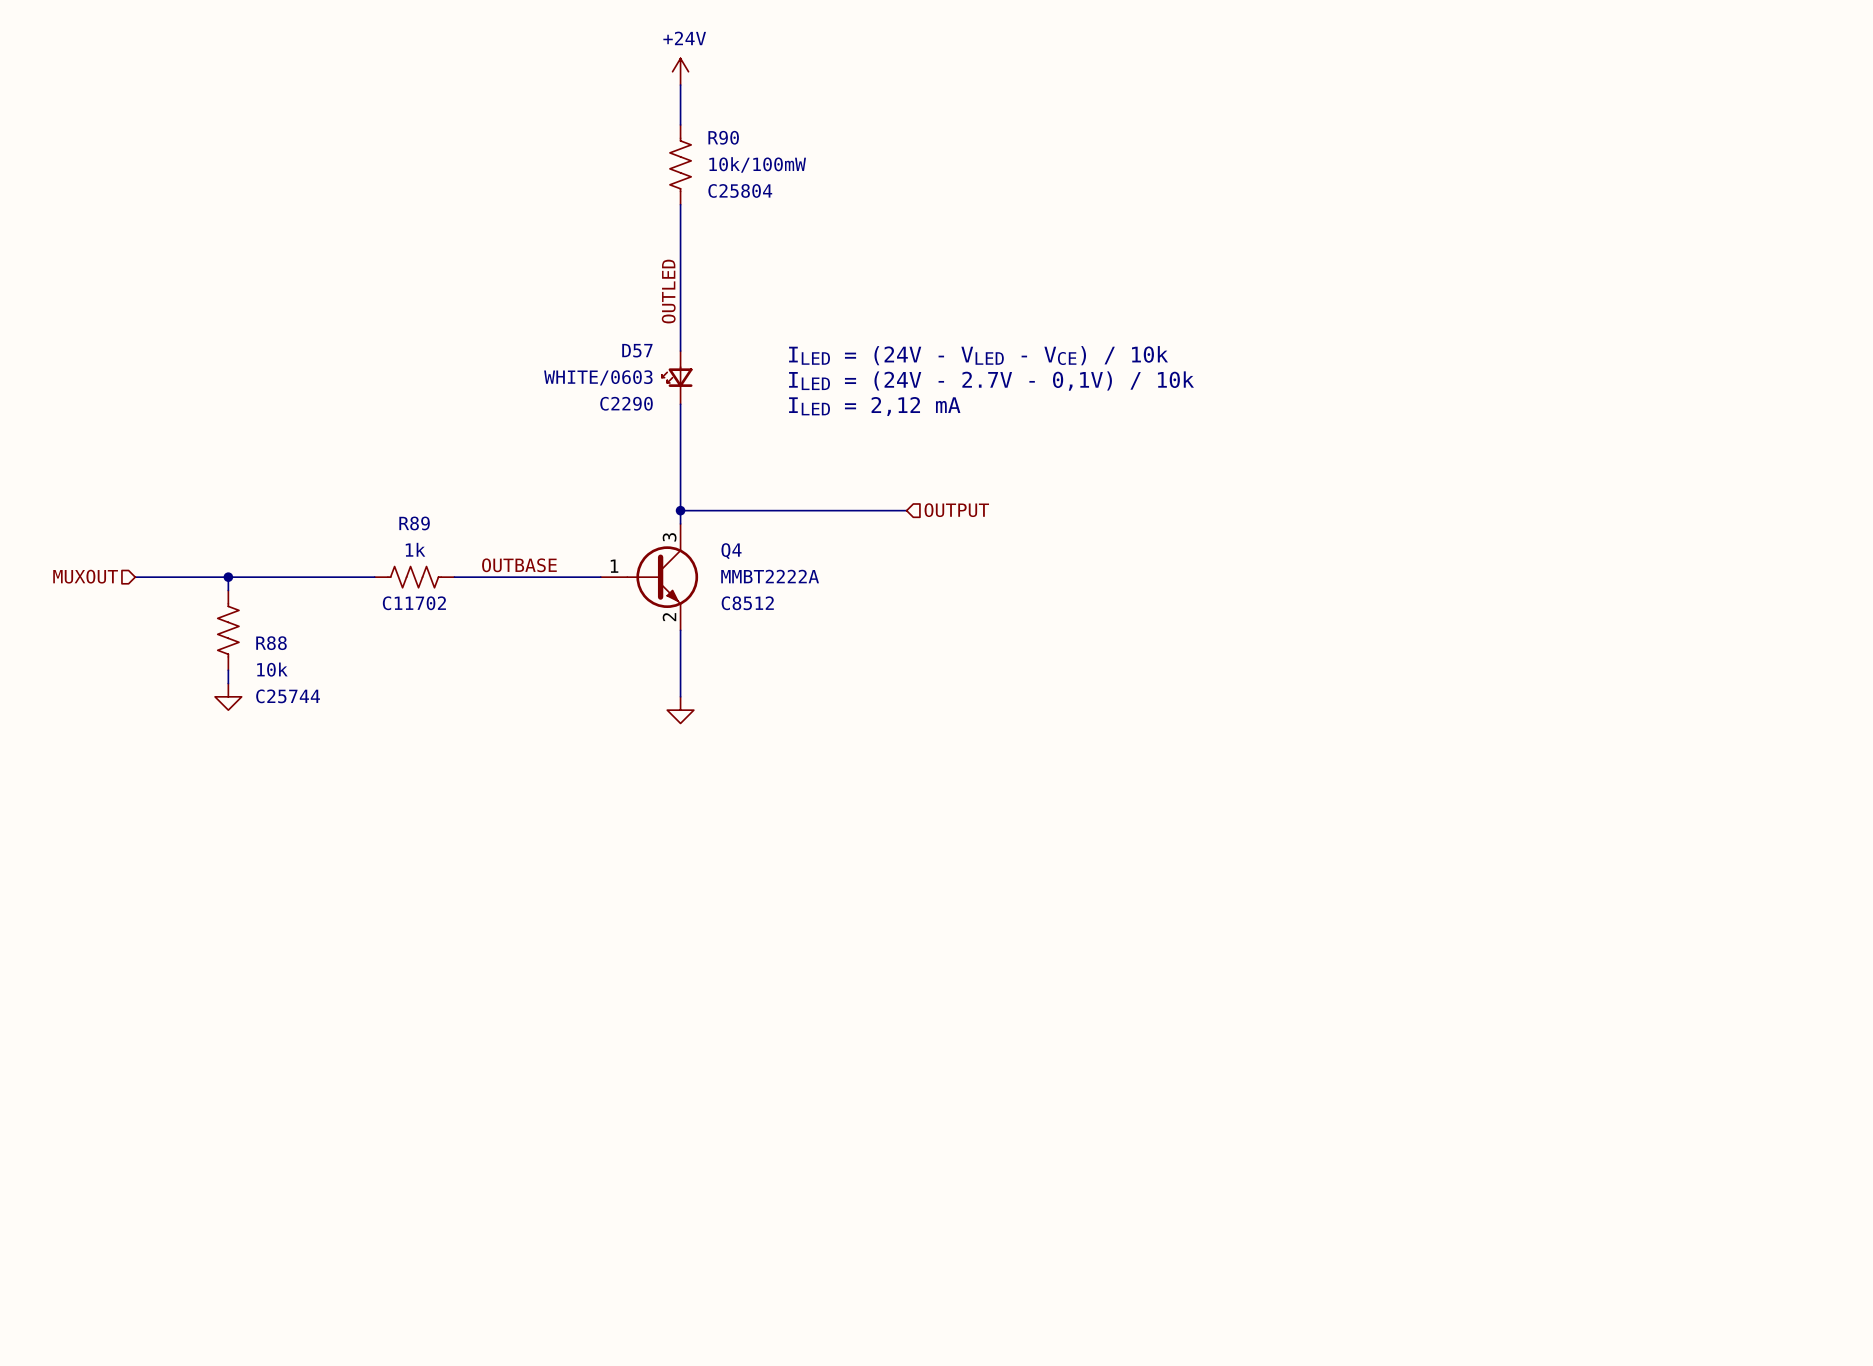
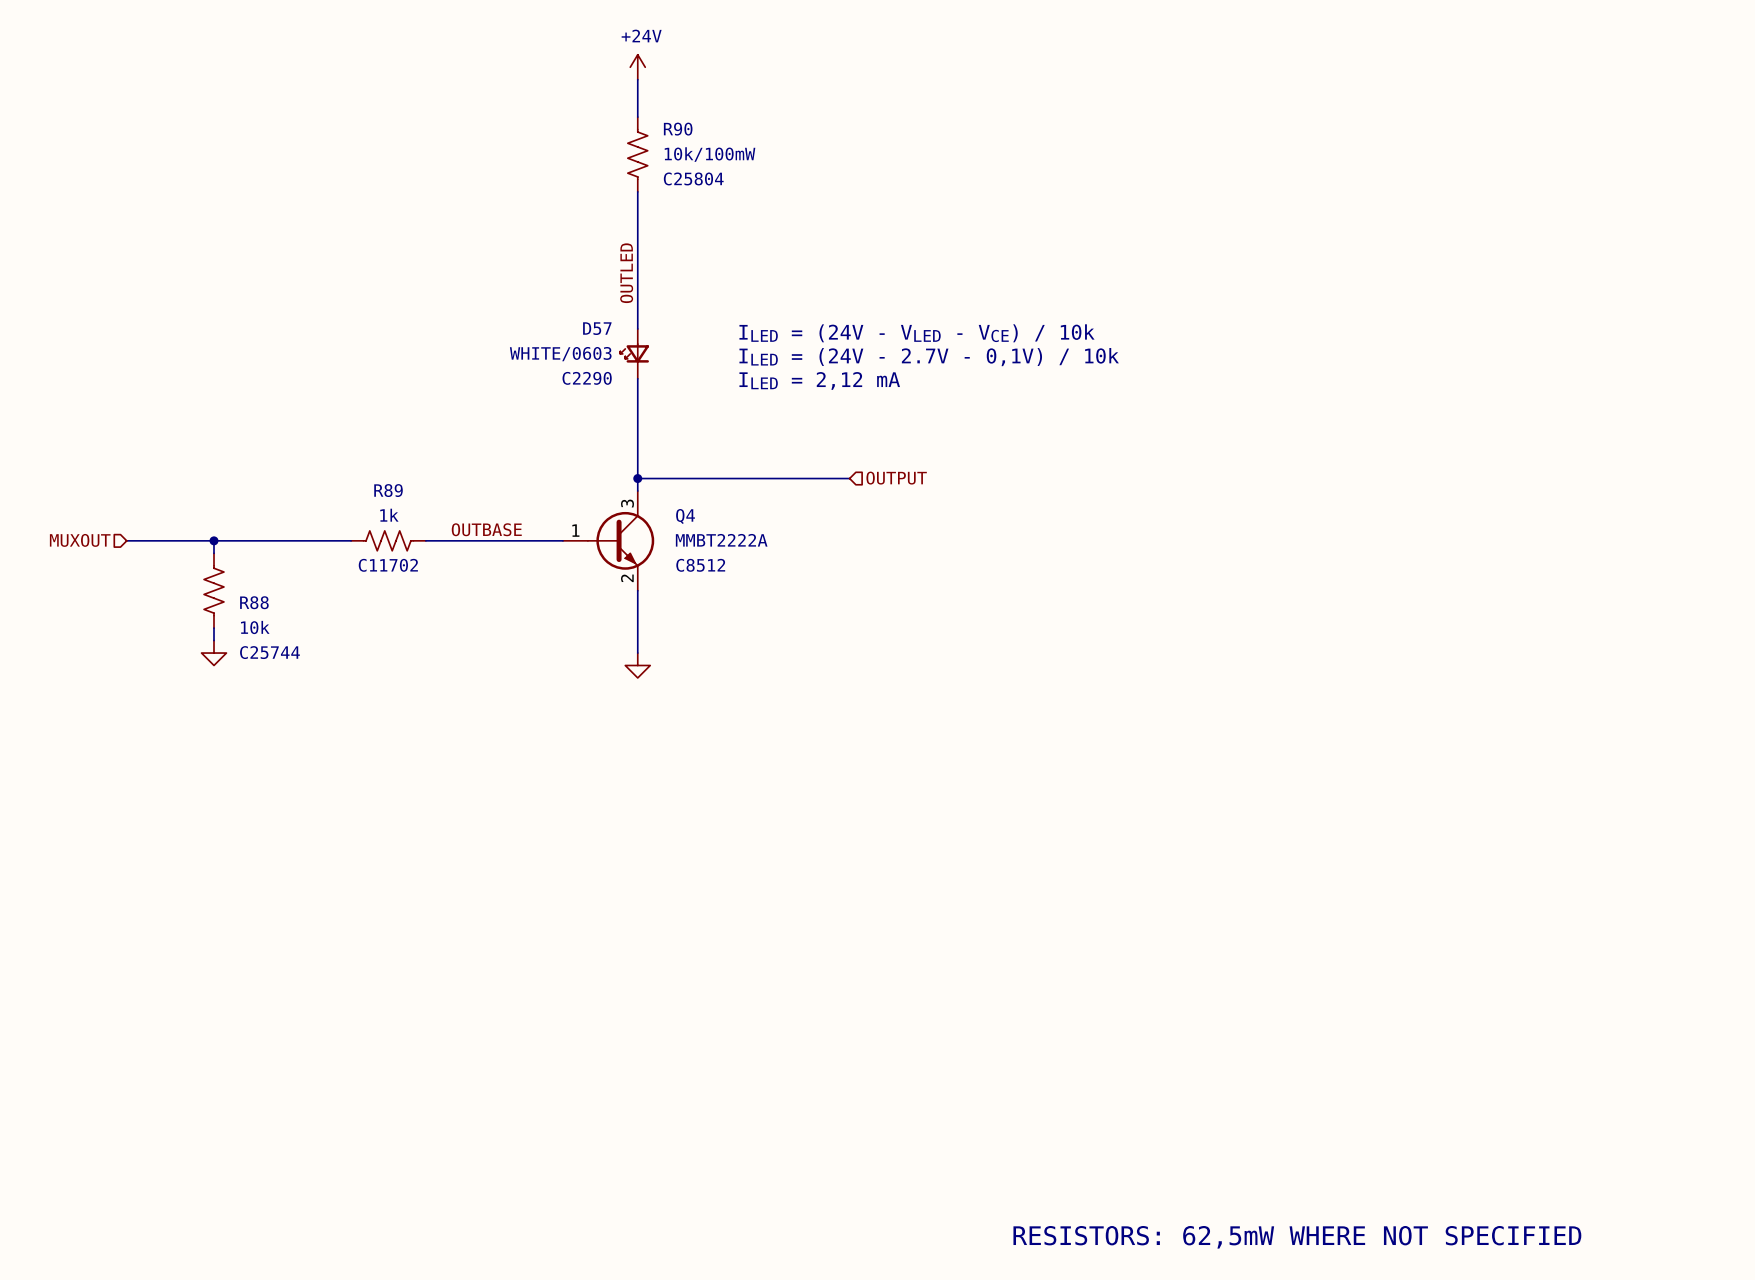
text: none -> RESISTORS: 62,5mW WHERE NOT SPECIFIED (1297, 1237)

